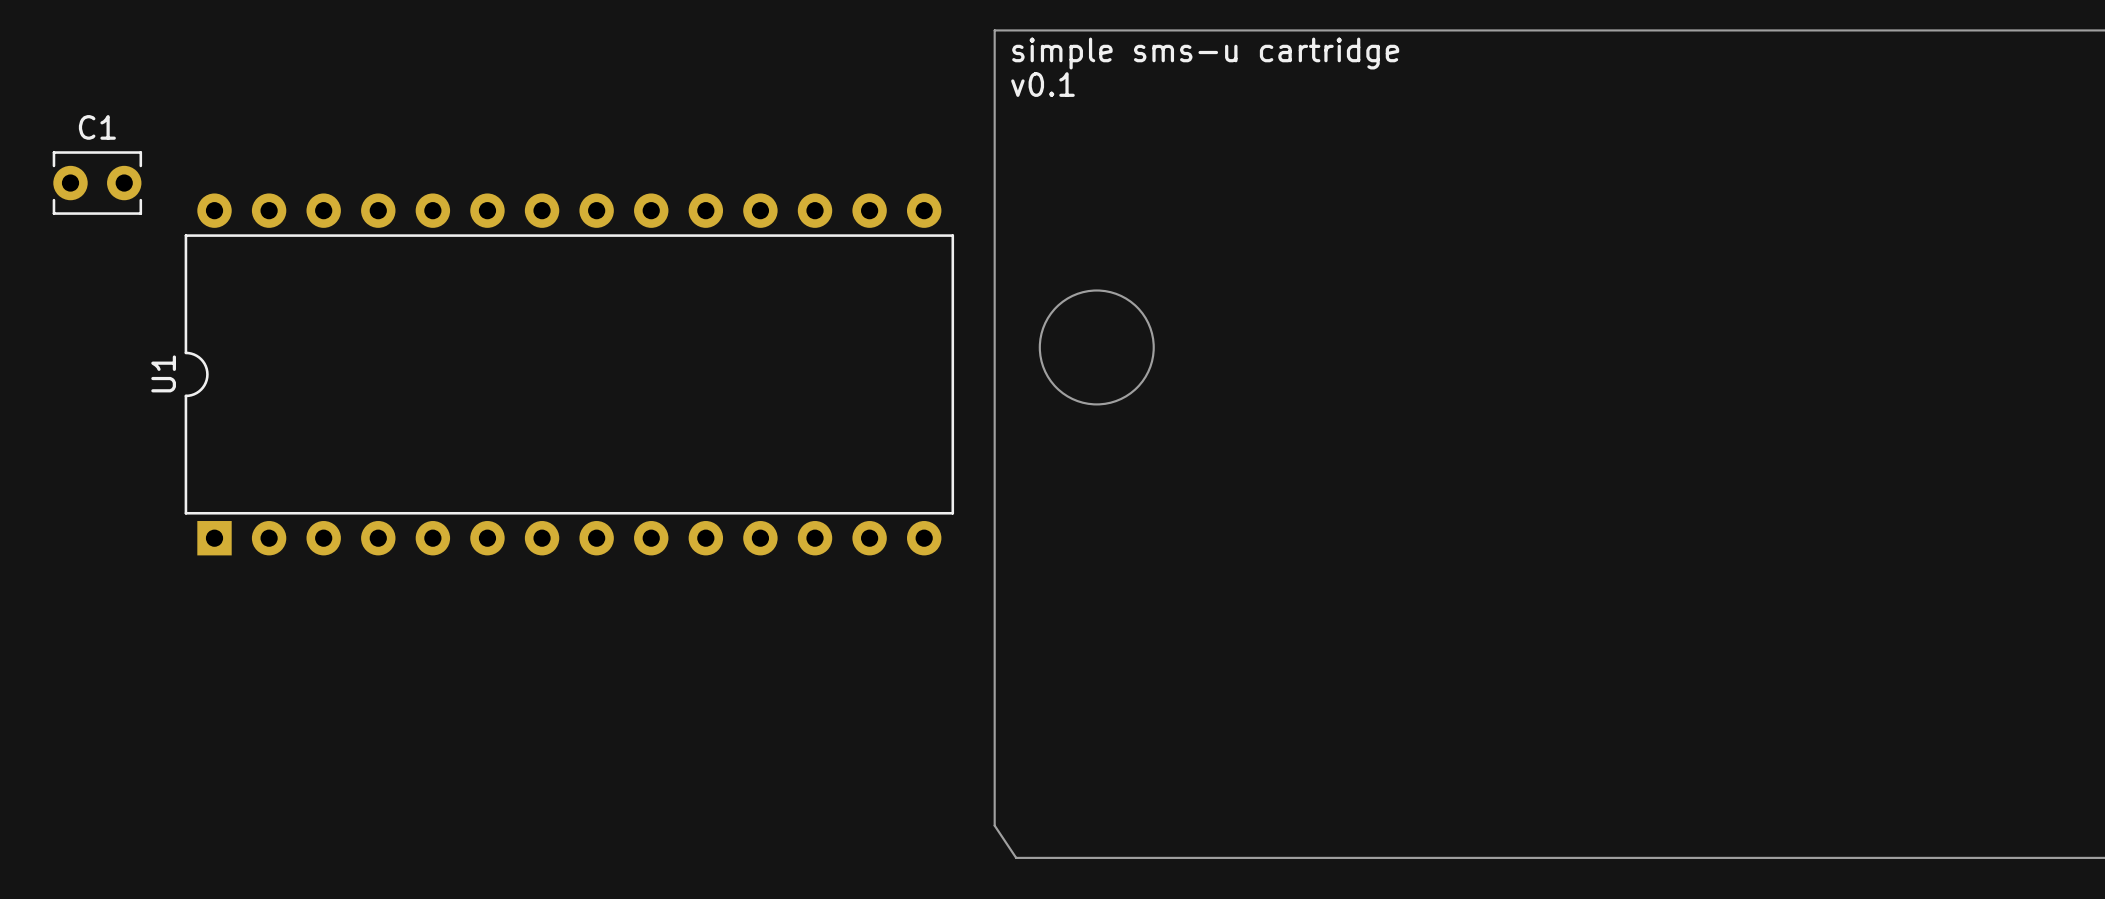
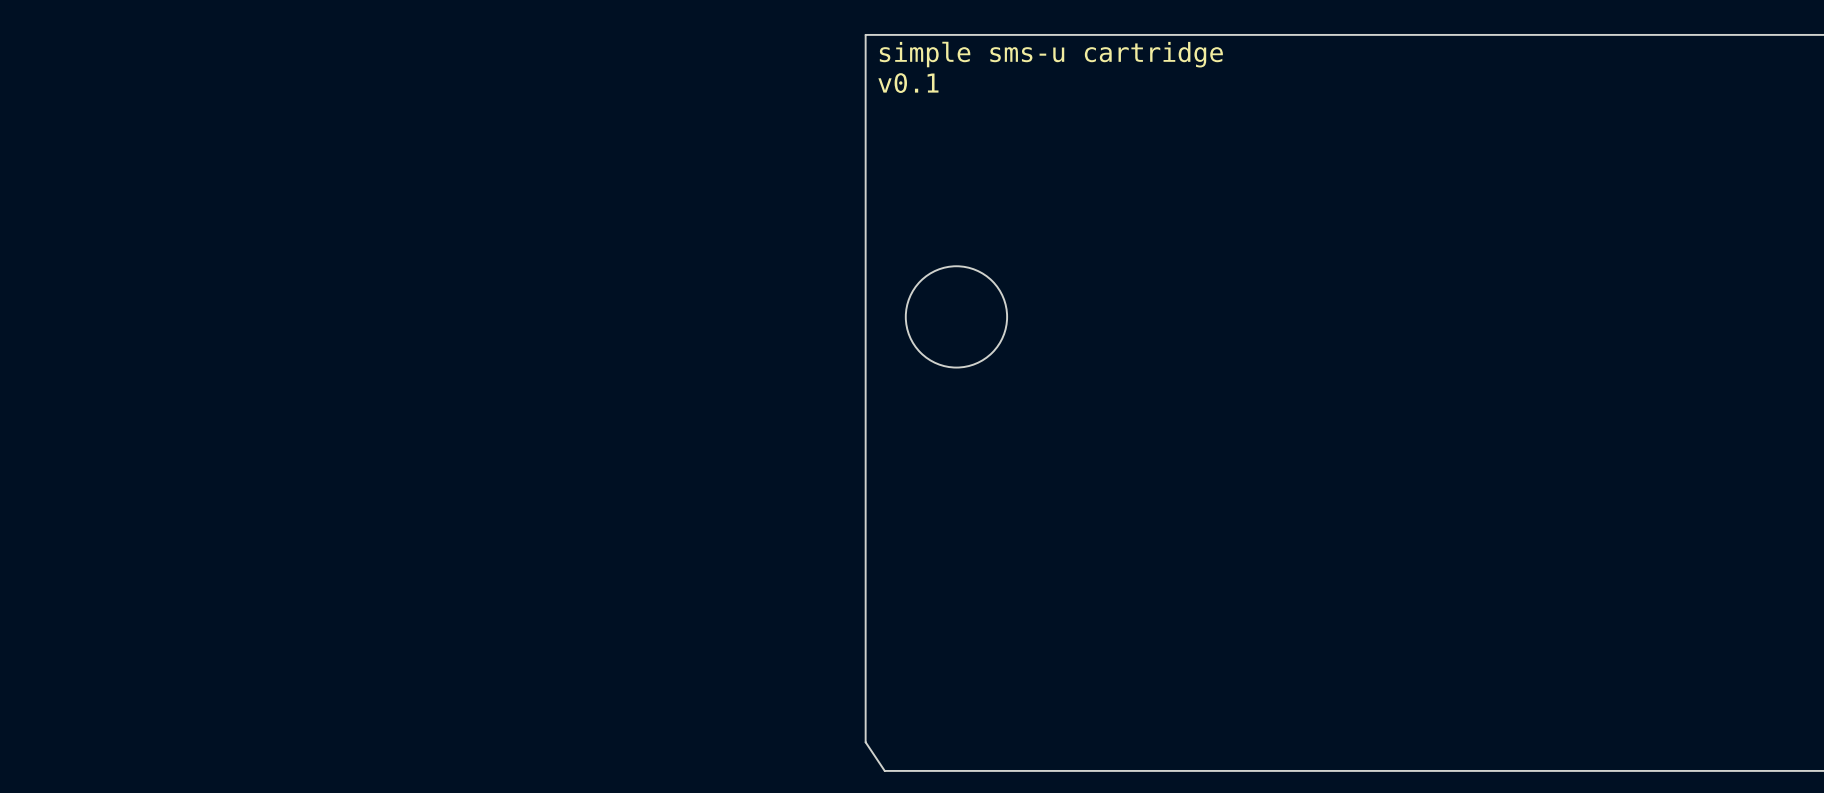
C1: (97, 183) -> none
U1: (569, 374) -> none

